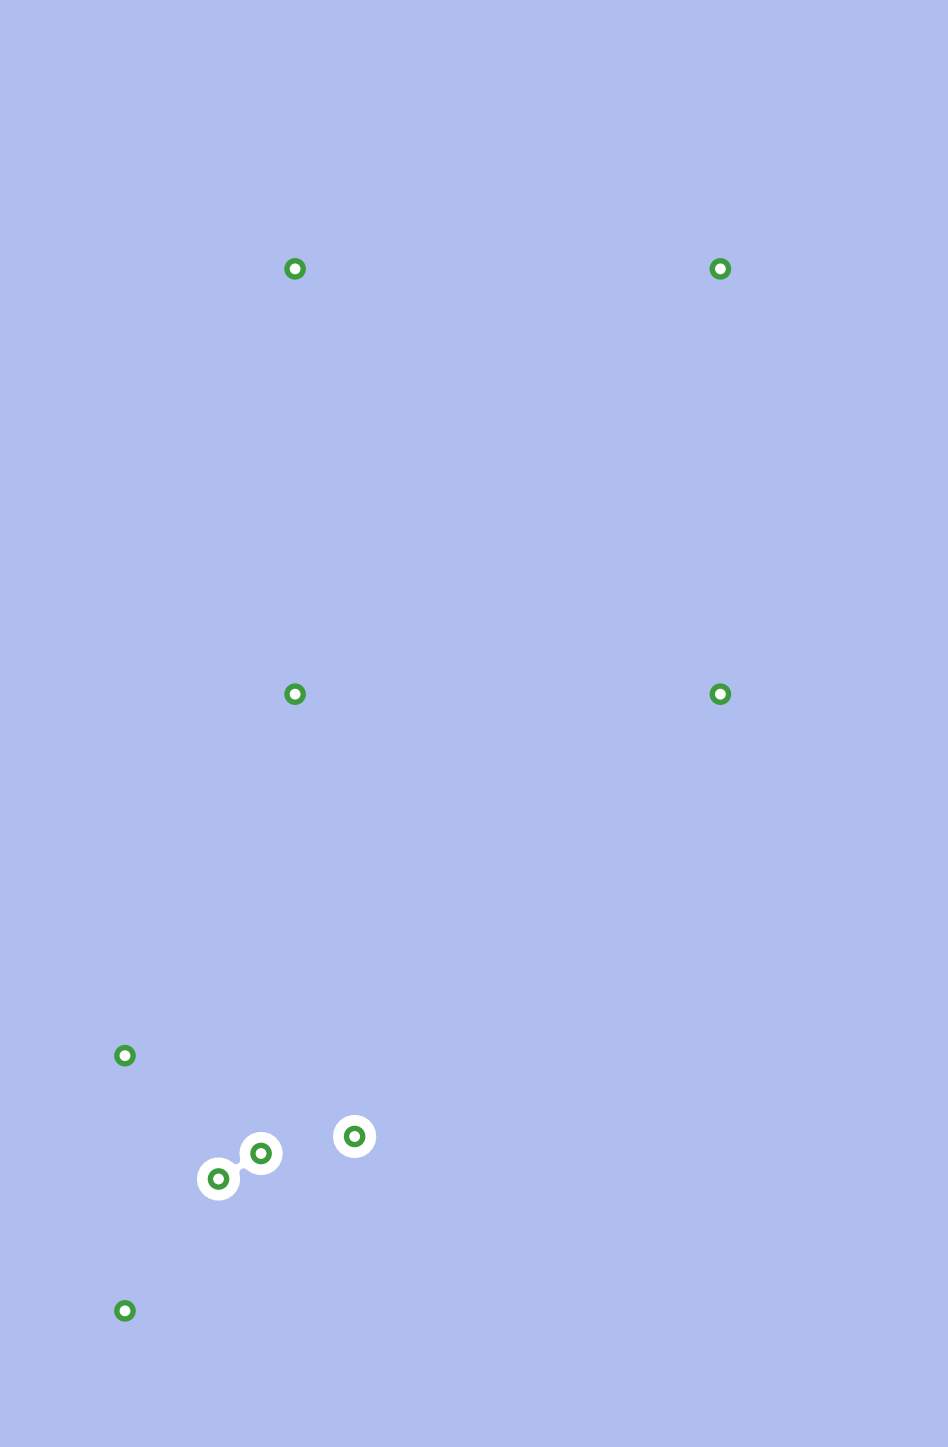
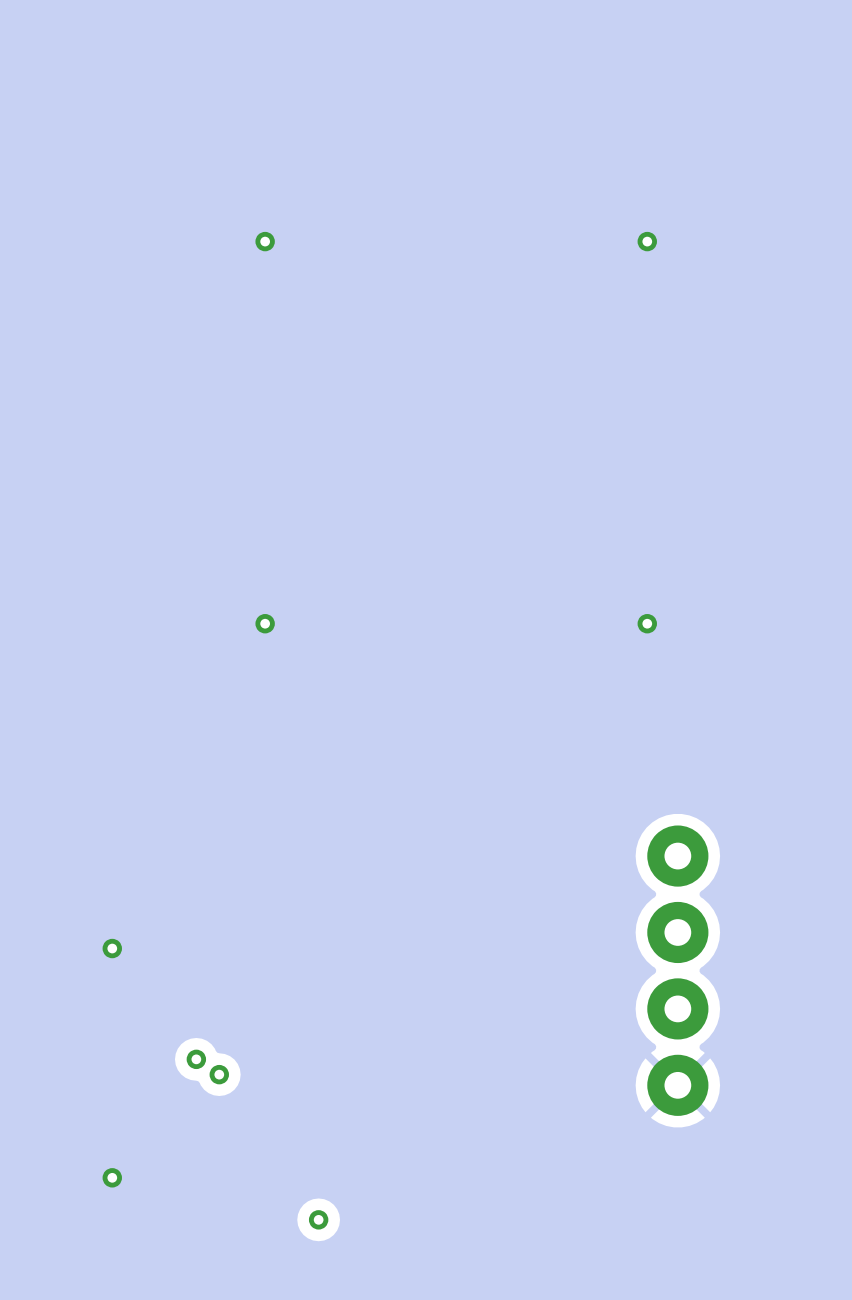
part: none -> (677, 970)
via: (354, 1136) -> none
via position: (261, 1153) -> (219, 1074)
via: none -> (318, 1219)

